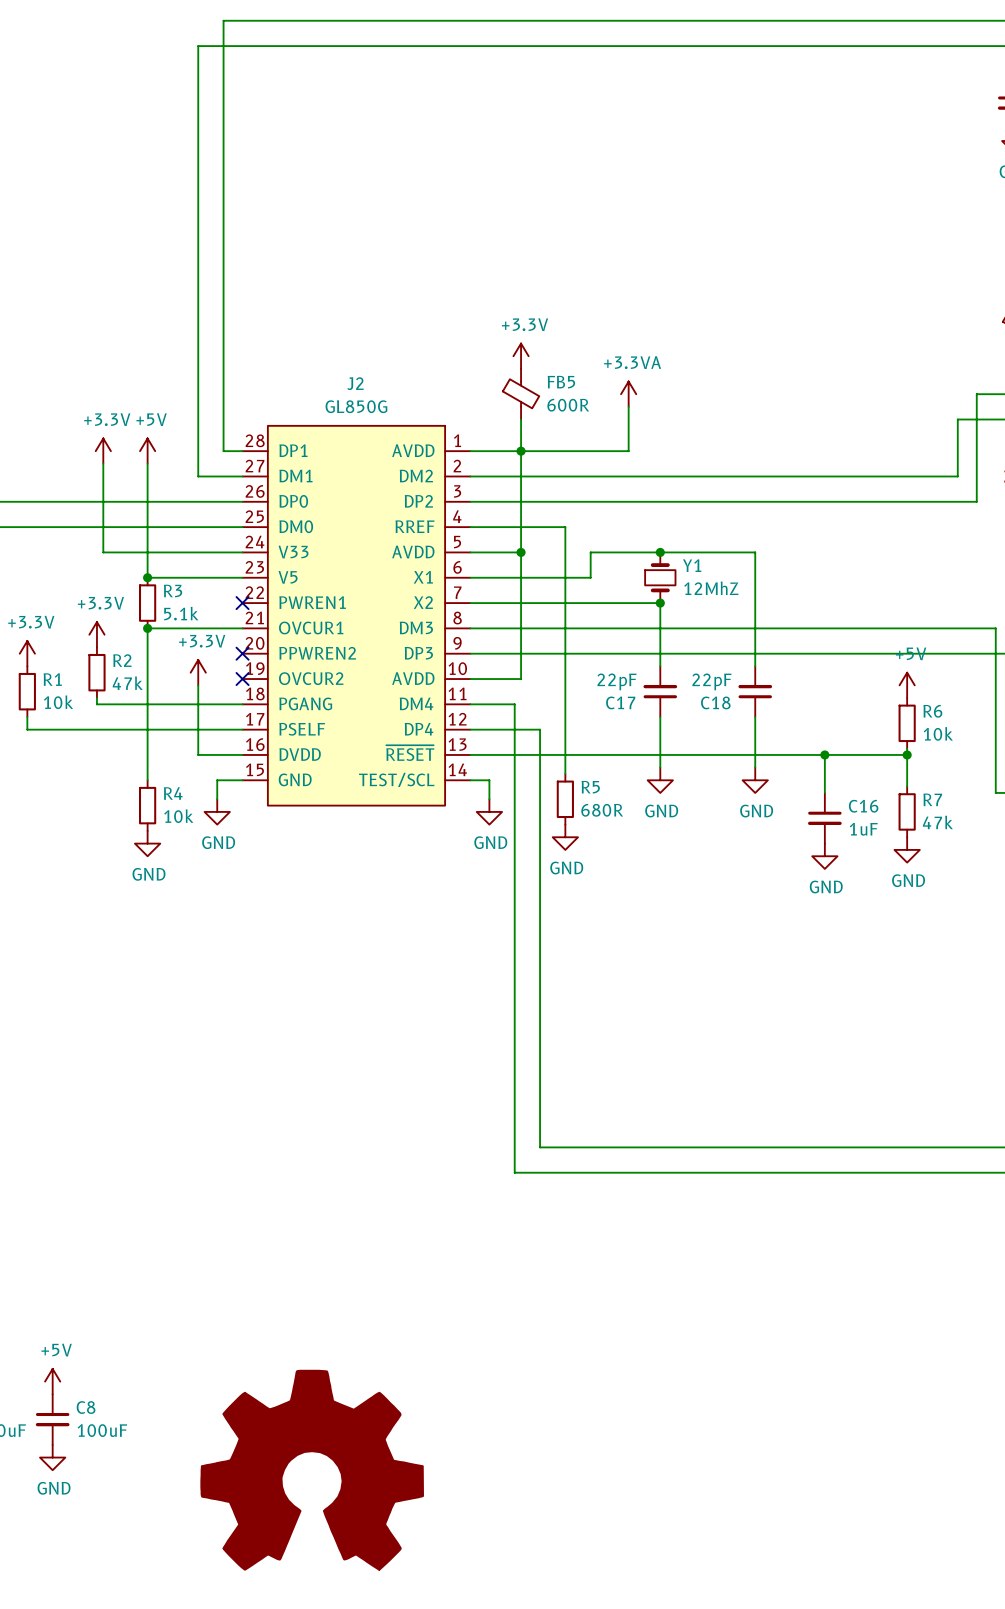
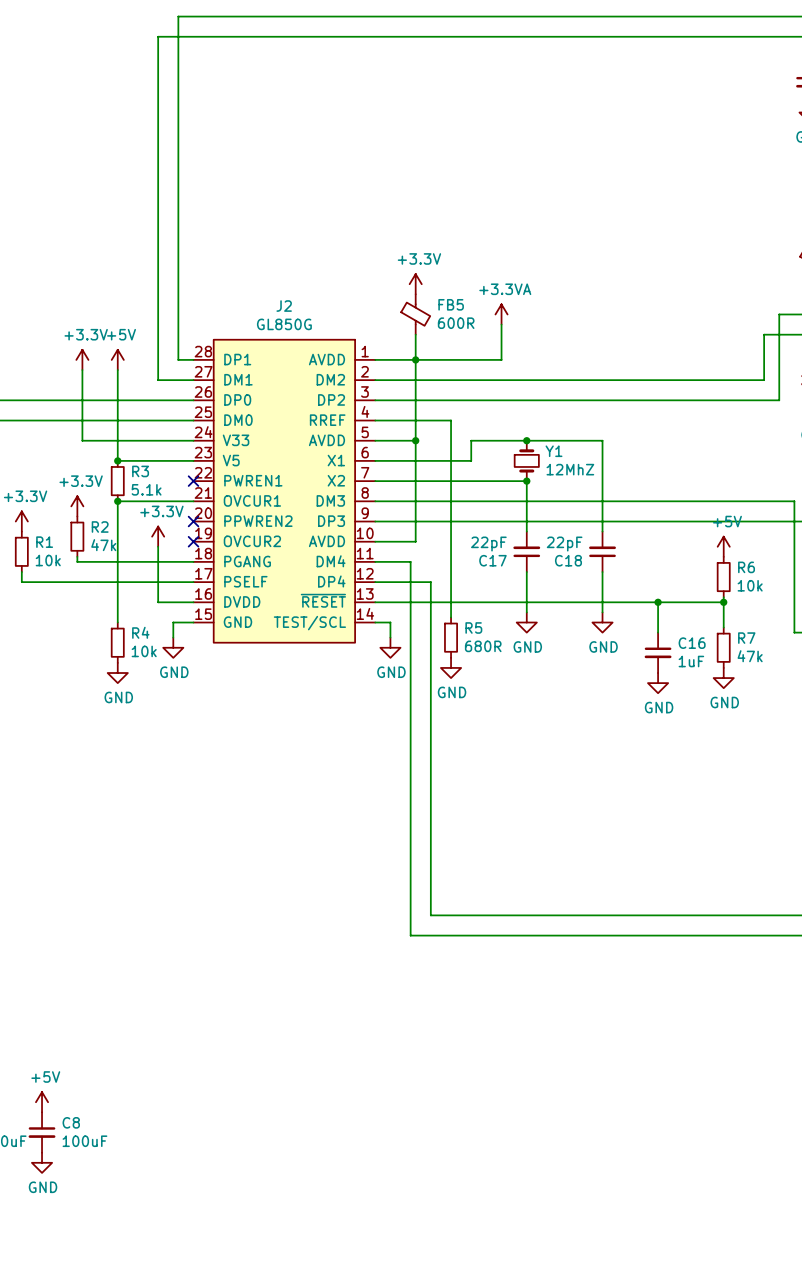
part: (312, 1470) -> none

